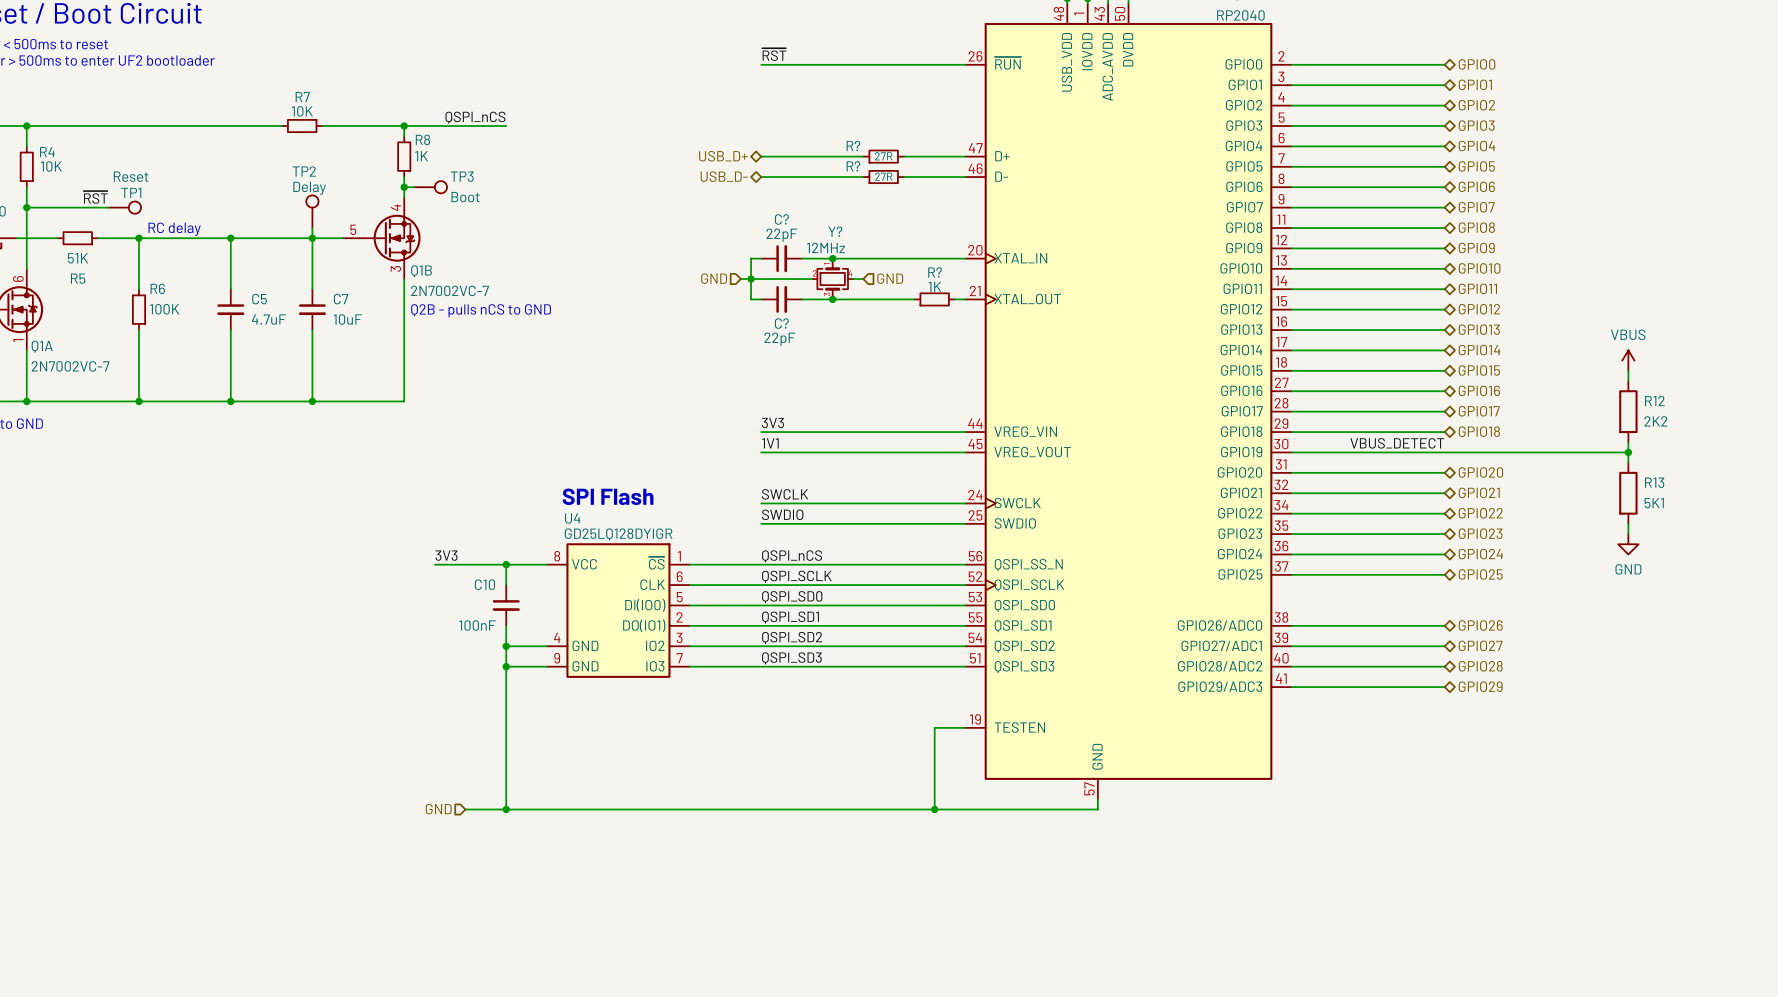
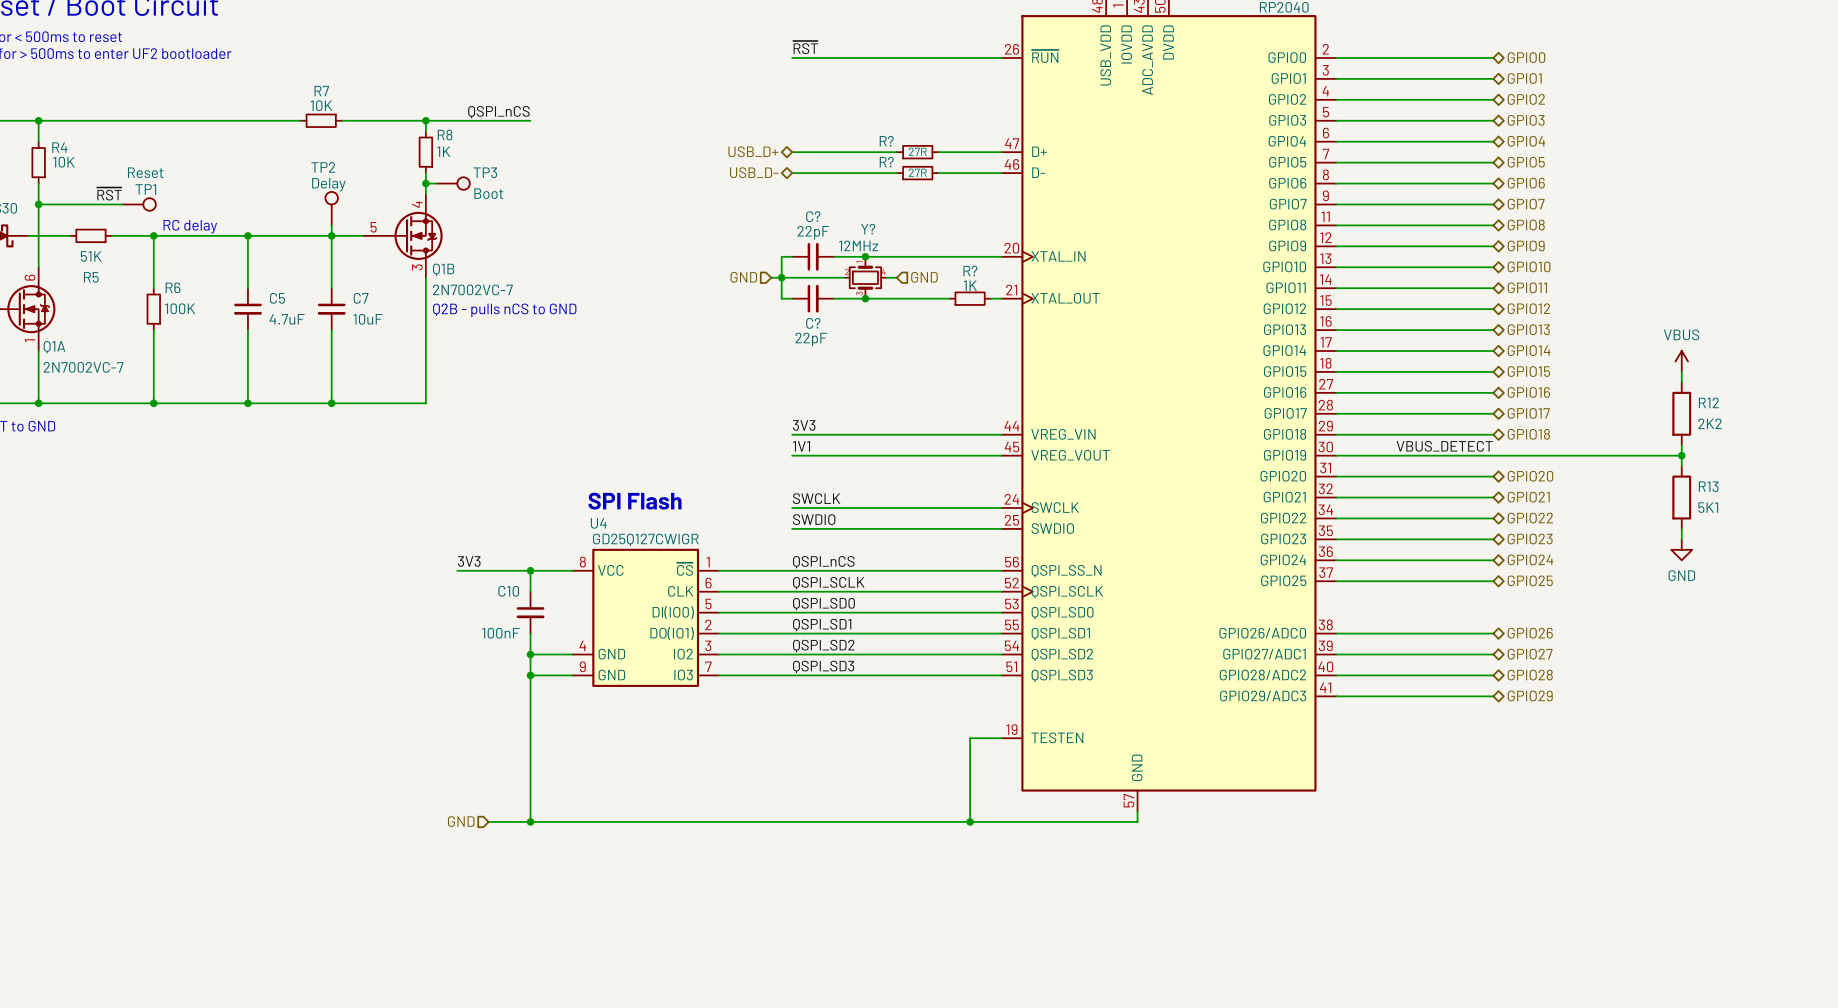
U4 value: GD25LQ128DYIGR (618, 534) -> GD25Q127CWIGR (645, 539)

